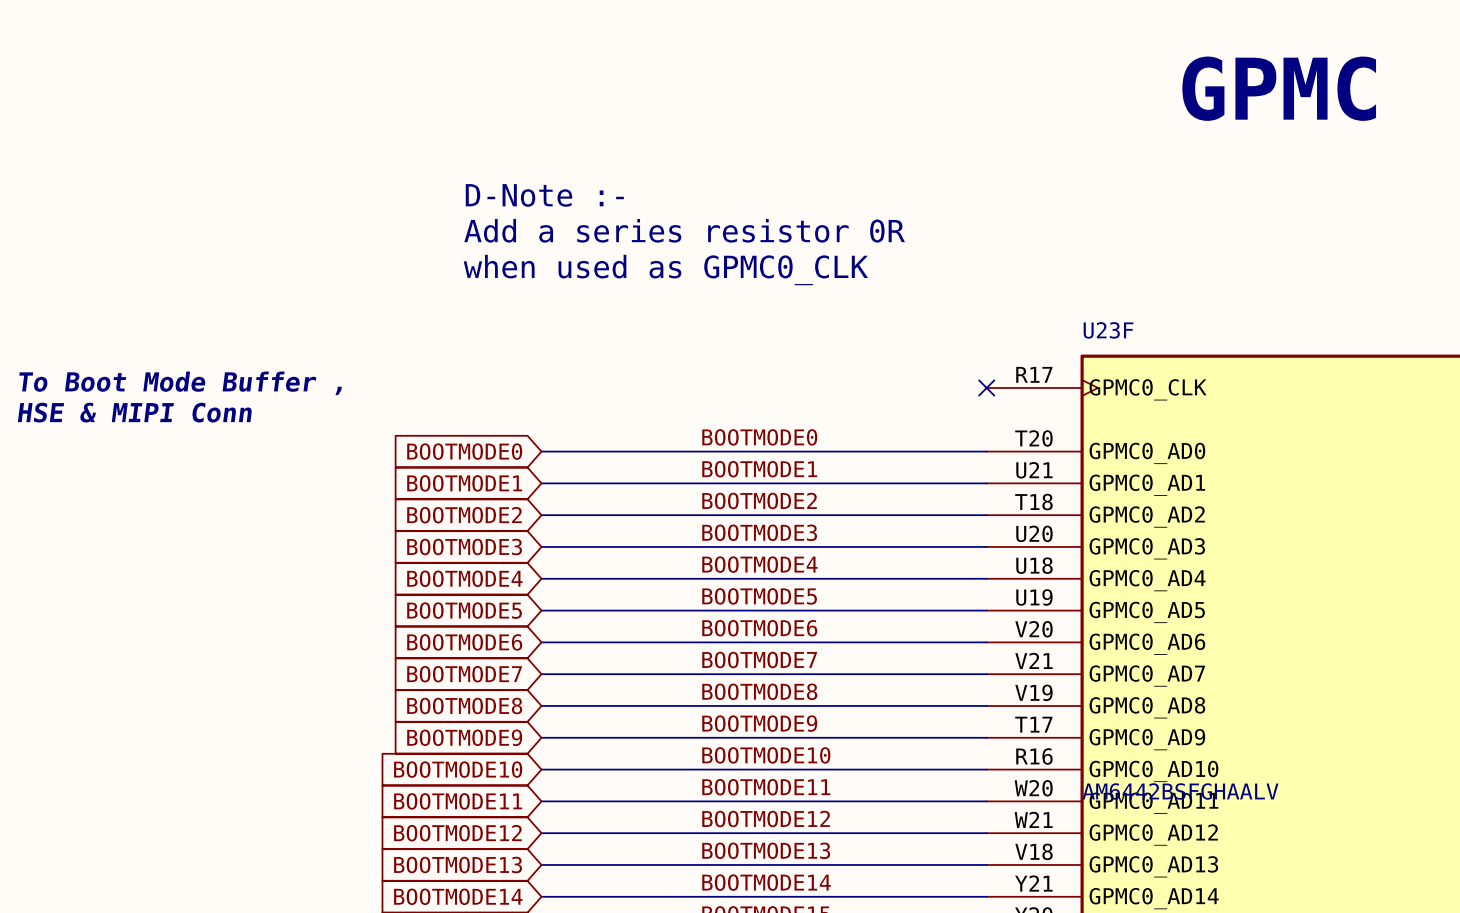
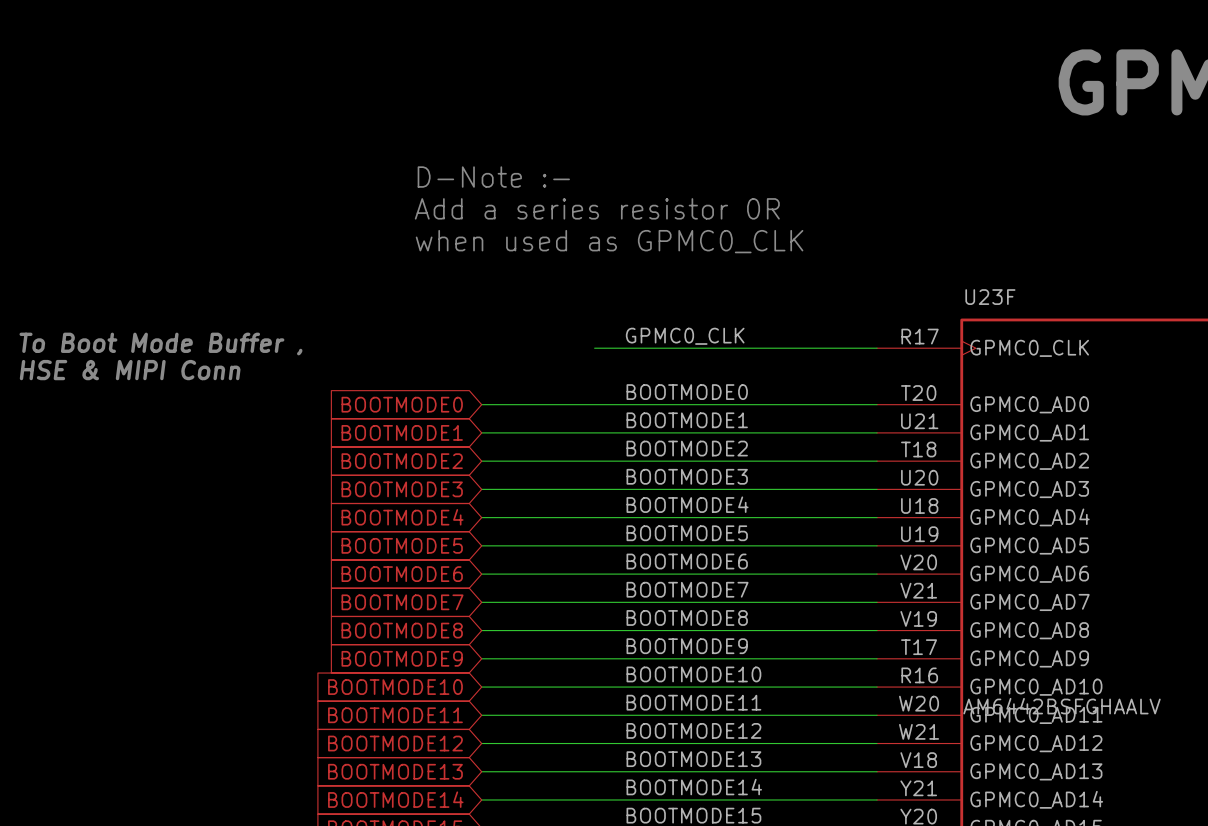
label: none -> GPMC0_CLK (685, 336)
wire: none -> (594, 348) (877, 348)
no-connect mark: (986, 387) -> none

